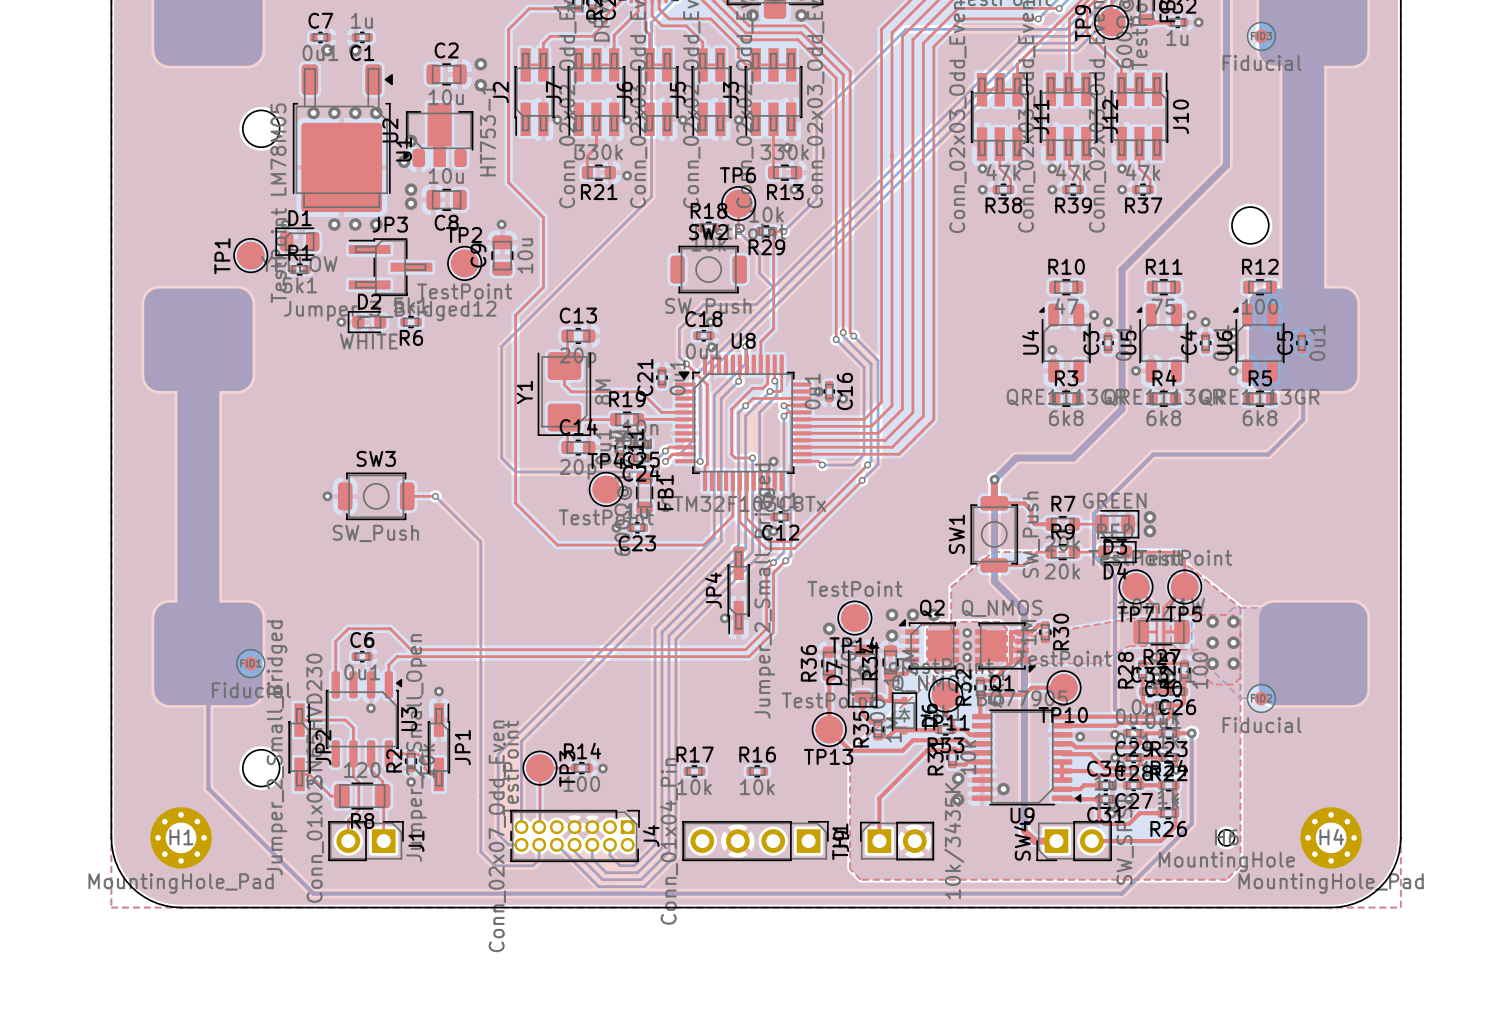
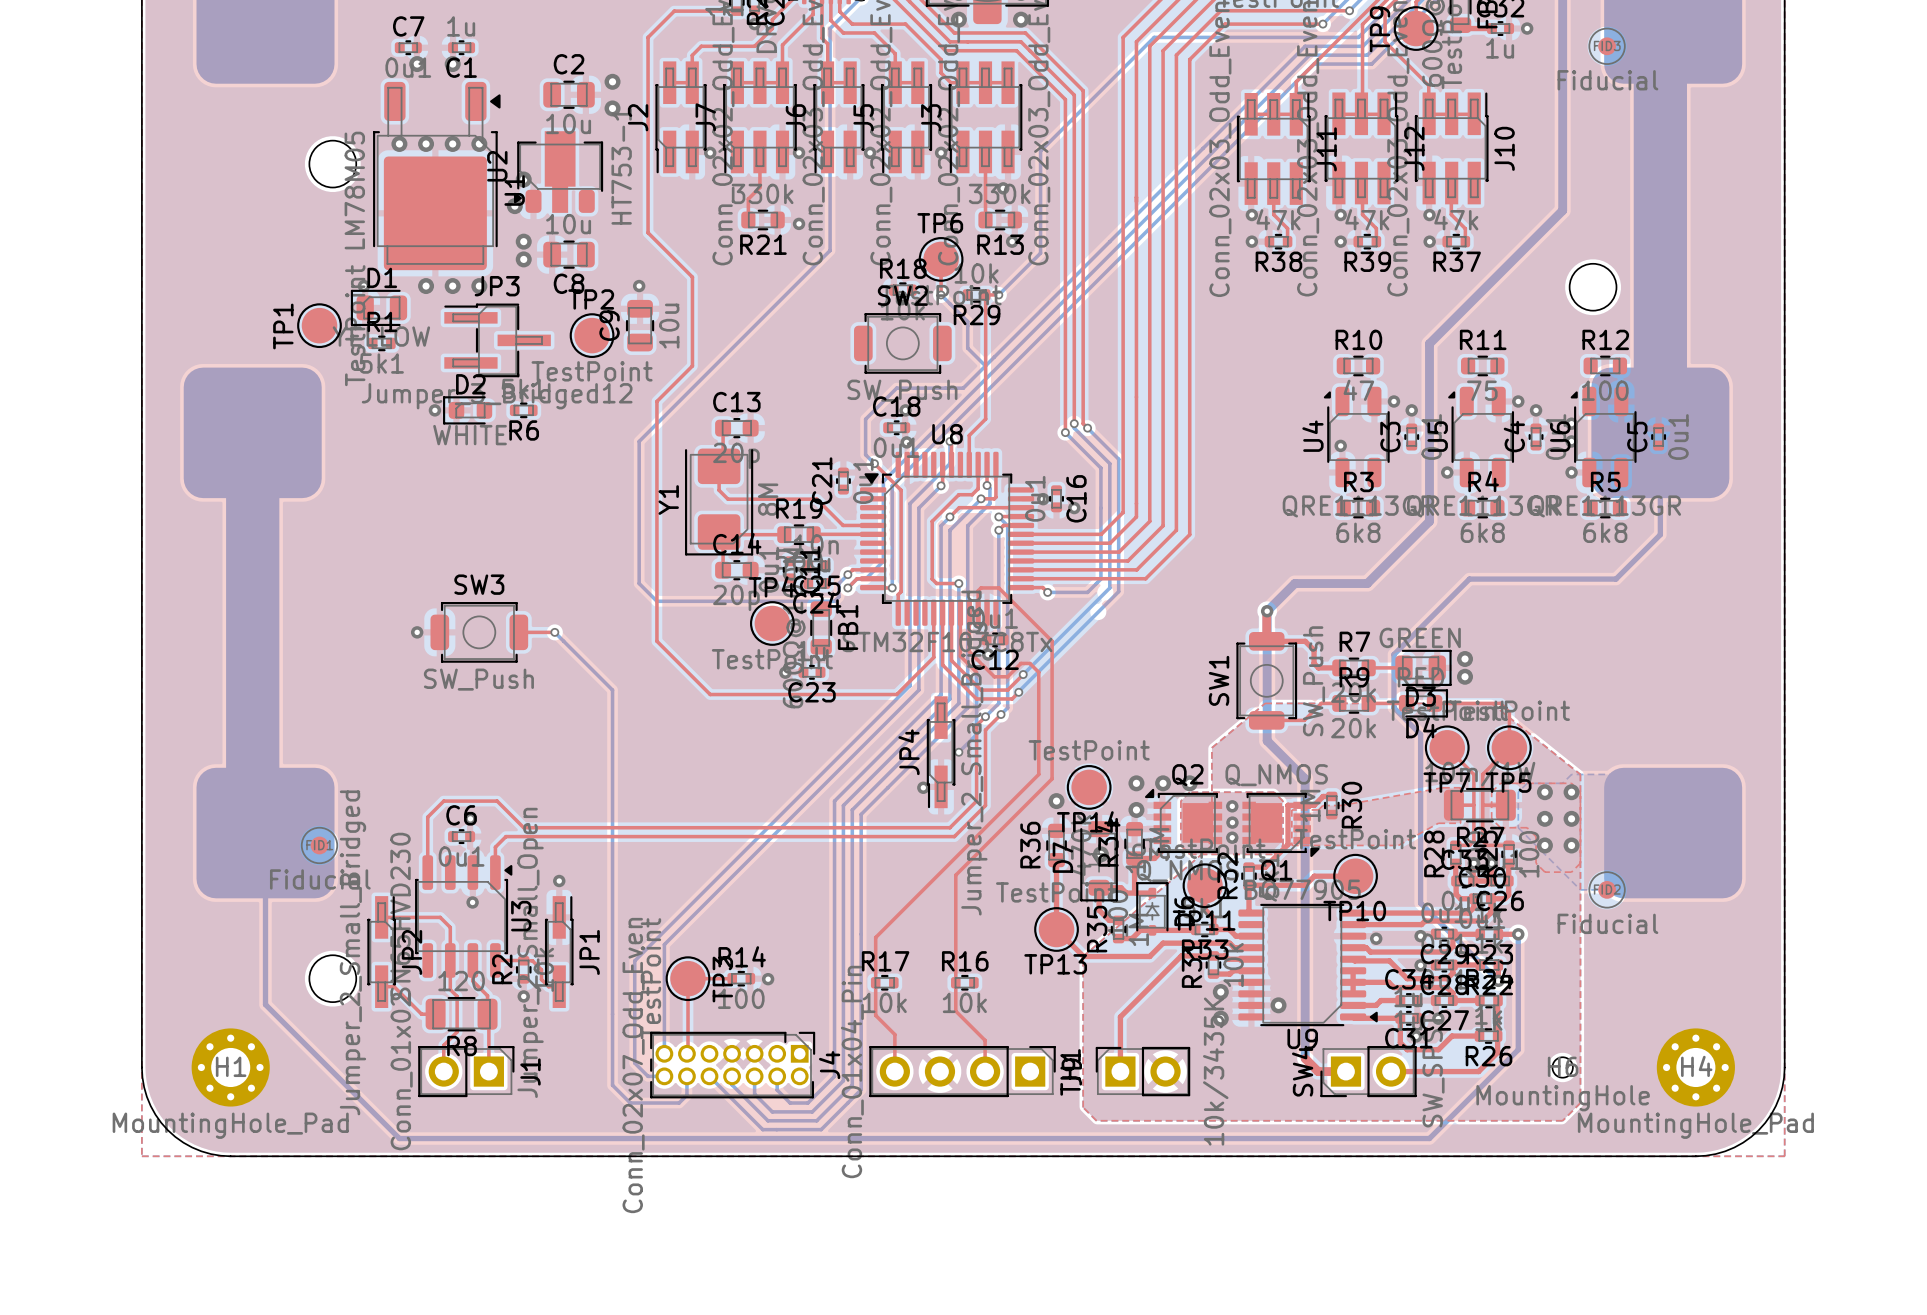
via: (773, 461) -> none
top track: (867, 464) (803, 529) -> none
bottom track: none -> (1105, 592) (1023, 674)
via: (867, 464) -> none
top track: none -> (960, 612) (960, 656) (976, 672)
top track: none -> (969, 612) (969, 651) (994, 676) (1007, 676) (1021, 663) (1029, 663) (1038, 672) (1038, 774) (875, 937) (875, 1015) (894, 1034) (894, 1071)
top track: none -> (978, 612) (978, 590) (981, 587) (998, 587) (1052, 641) (1052, 778) (955, 875) (955, 1011) (985, 1040) (985, 1071)
top track: (862, 480) (799, 543) -> none
bottom track: none -> (1098, 612) (1018, 692)
via: (862, 480) -> none
C12 position: (780, 516) -> (995, 639)
bottom track: none -> (976, 672) (976, 734) (958, 752)
via: none -> (1023, 674)
via position: (773, 531) -> (988, 654)
via: none -> (1018, 692)
via: none -> (958, 752)

